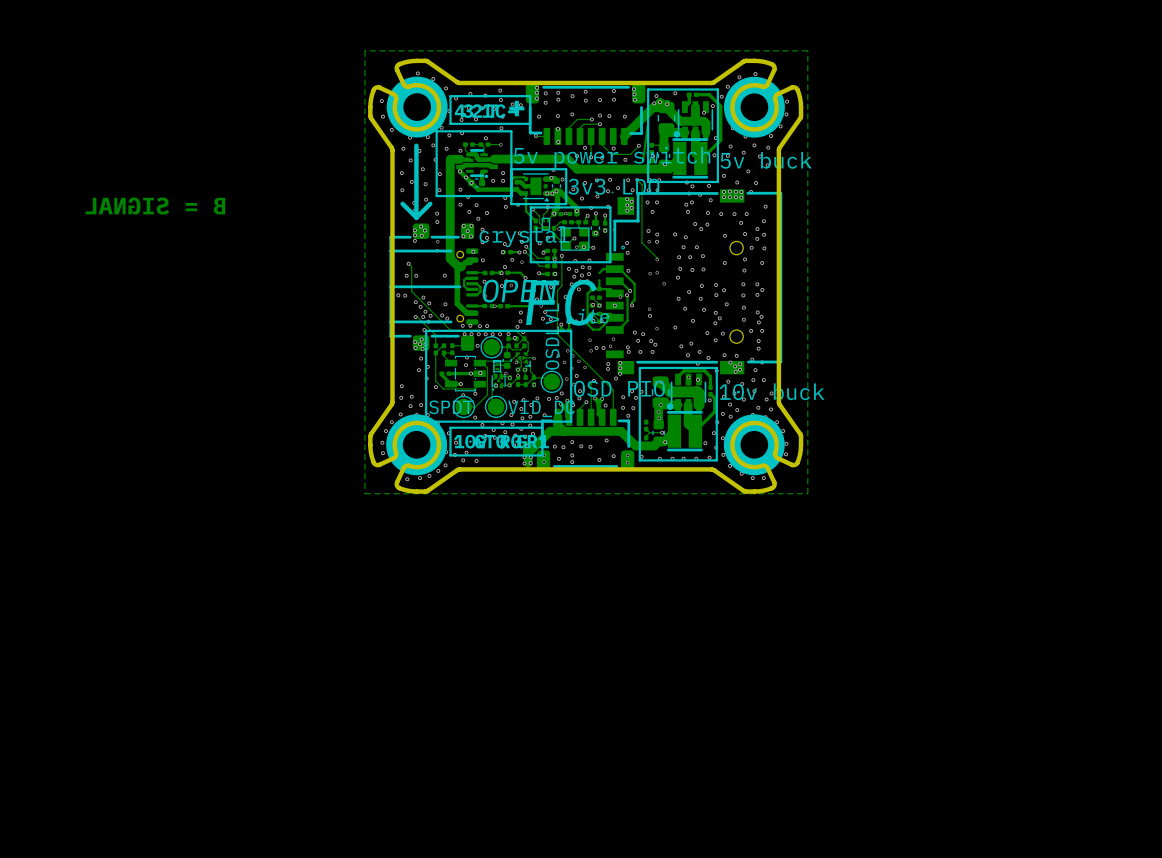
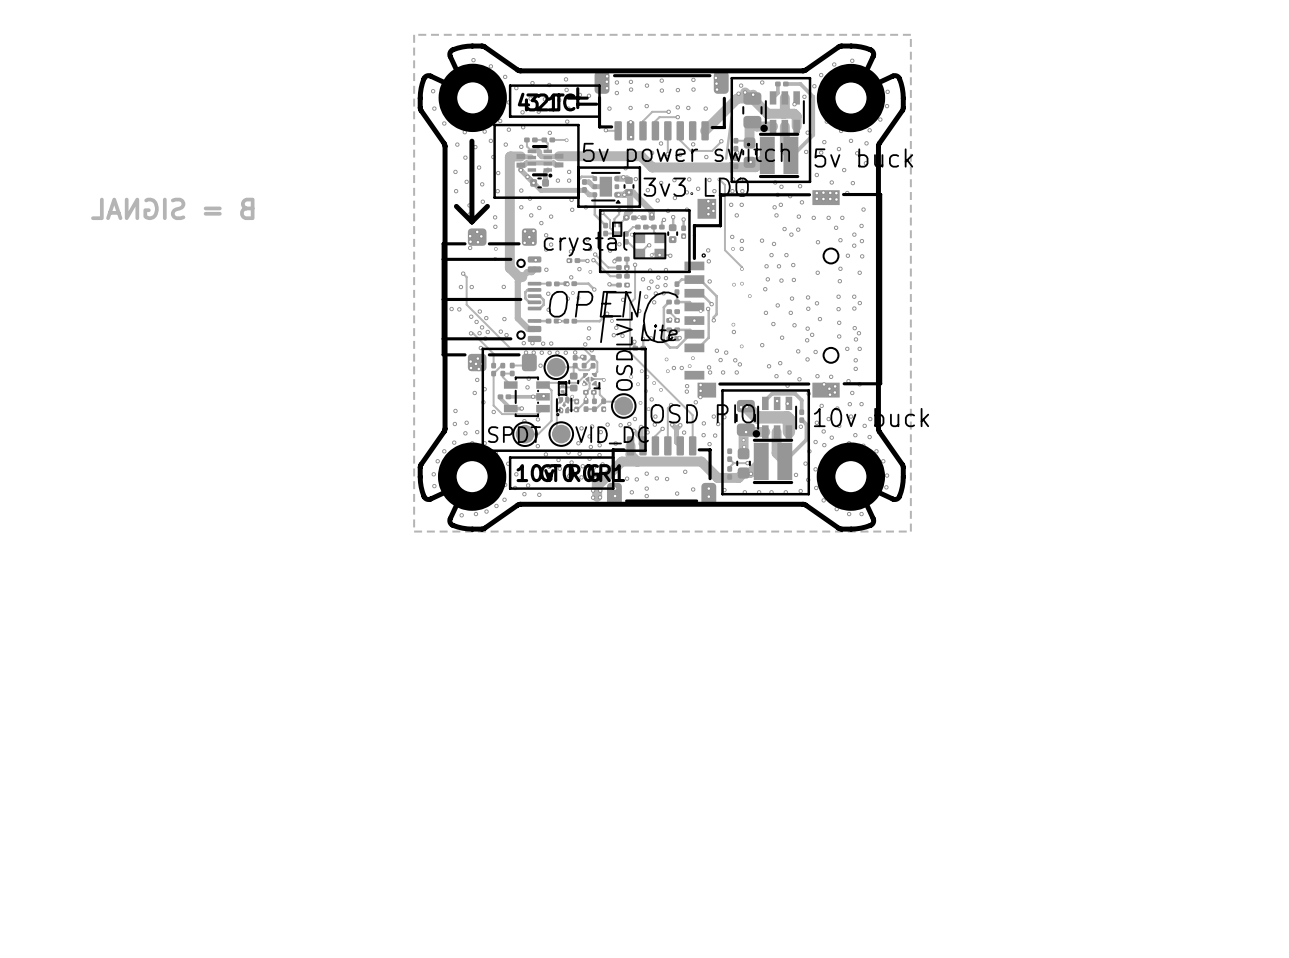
part: none -> (676, 288)

